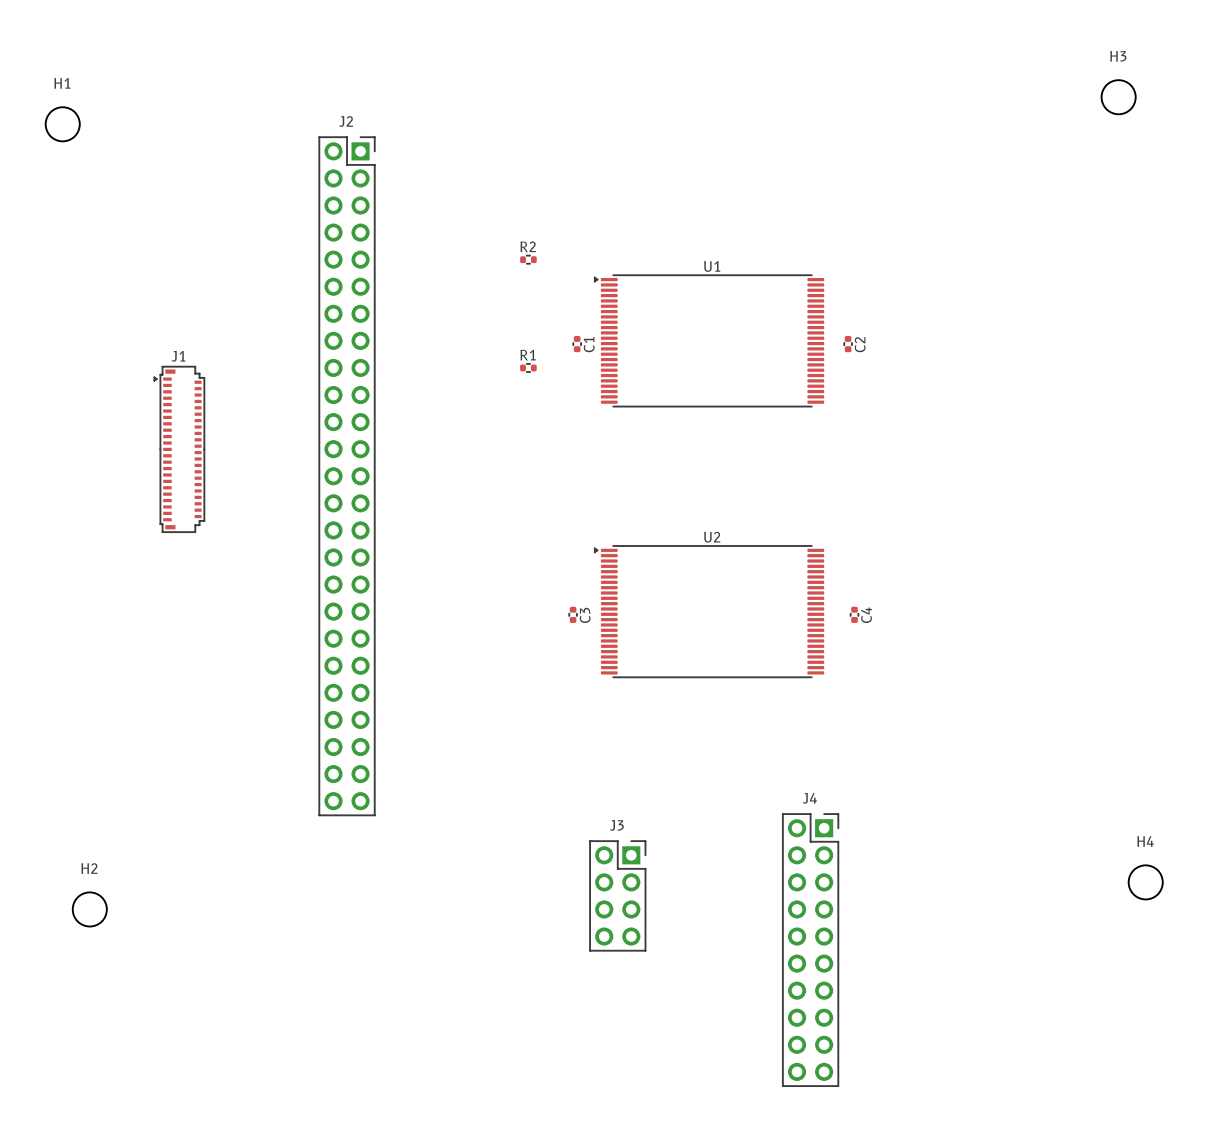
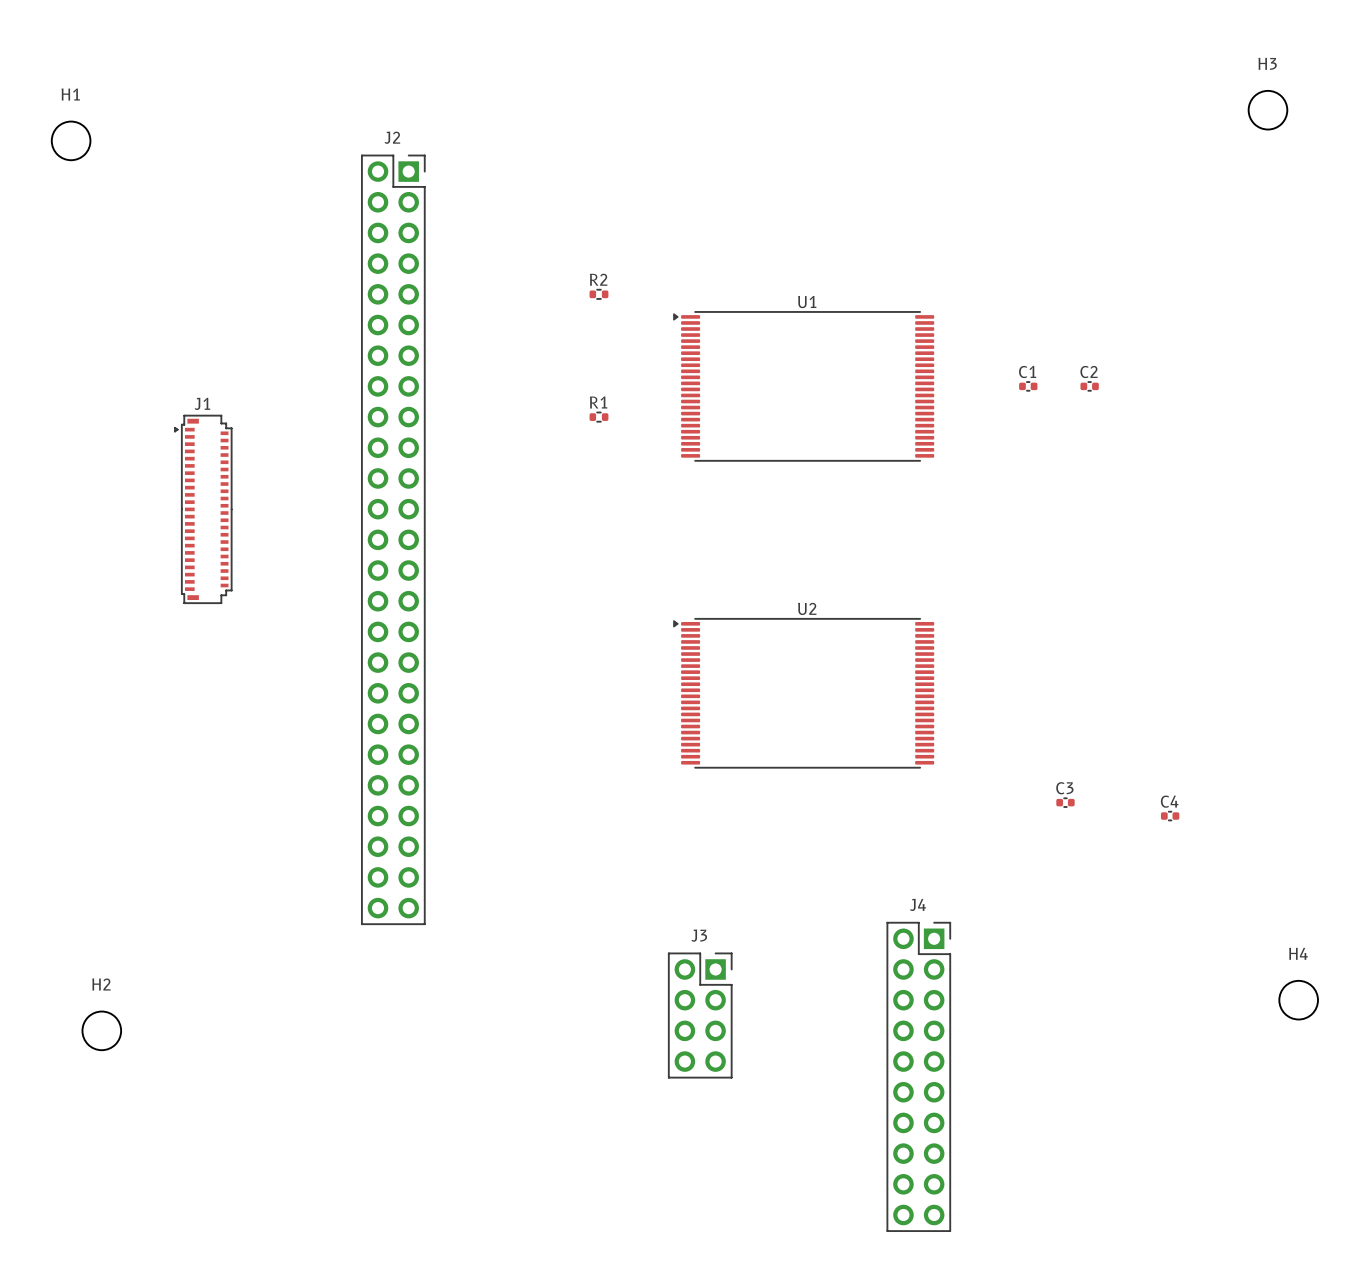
C1 rotation: 0° (577, 344) -> 90° clockwise (1028, 386)
C1 position: (577, 344) -> (1028, 386)
C2 rotation: 0° (848, 344) -> 90° clockwise (1089, 386)
C2 position: (848, 344) -> (1089, 386)
C3 rotation: 0° (573, 614) -> 90° clockwise (1065, 802)
C3 position: (573, 614) -> (1065, 802)
C4 rotation: 0° (854, 614) -> 90° clockwise (1170, 816)
C4 position: (854, 614) -> (1170, 816)

